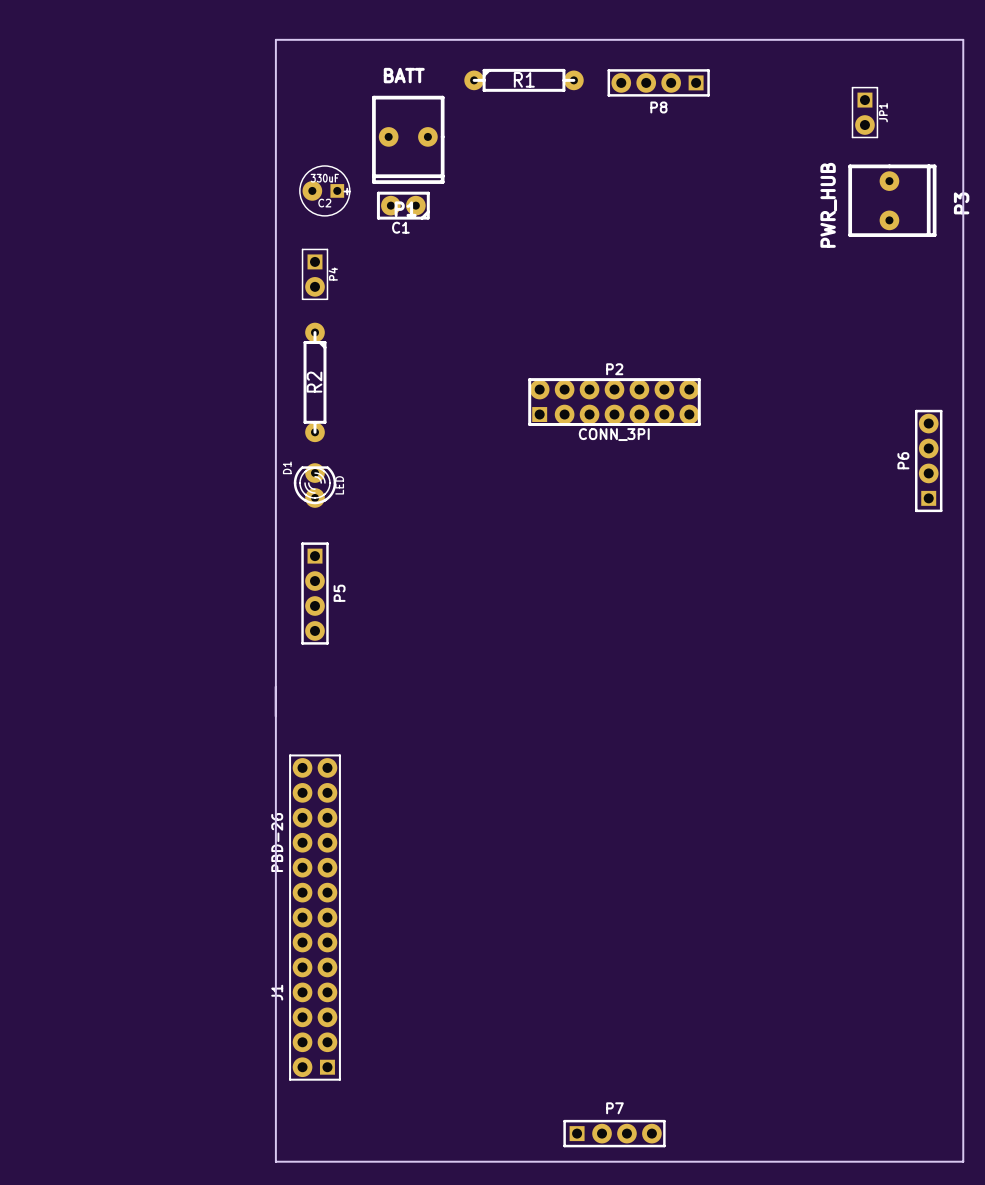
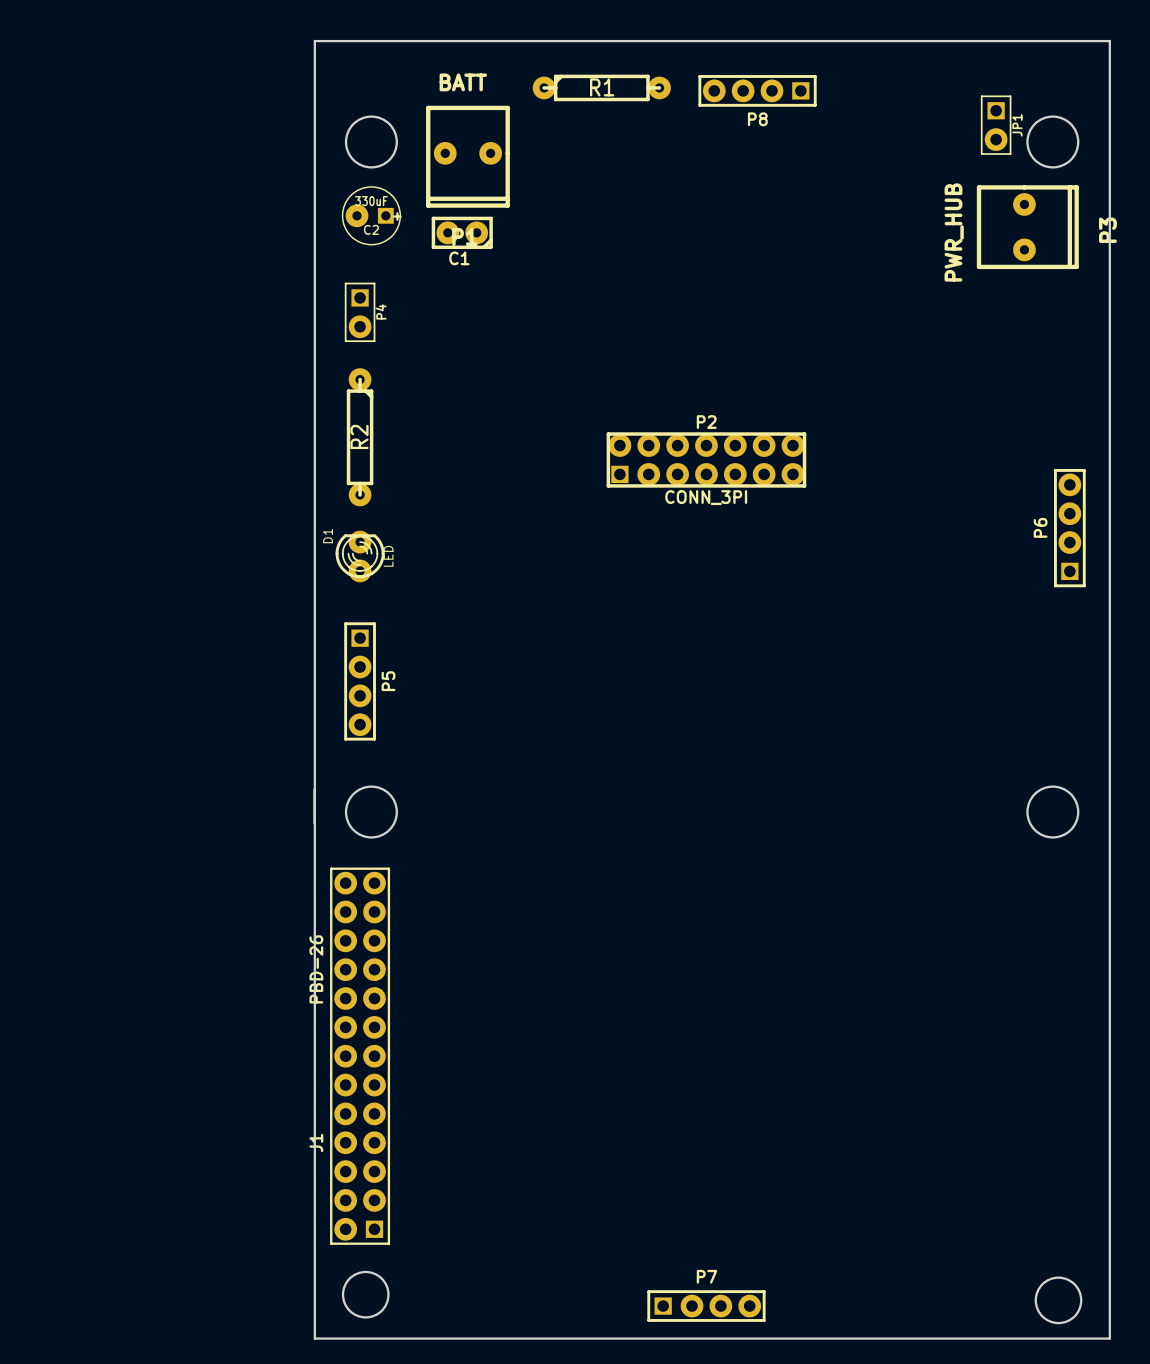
round board edge: none -> [344, 115, 398, 169]
round board edge: none -> [1026, 115, 1080, 169]
round board edge: none -> [344, 785, 398, 839]
round board edge: none -> [1026, 785, 1080, 839]
round board edge: none -> [341, 1270, 390, 1319]
round board edge: none -> [1034, 1276, 1083, 1325]

